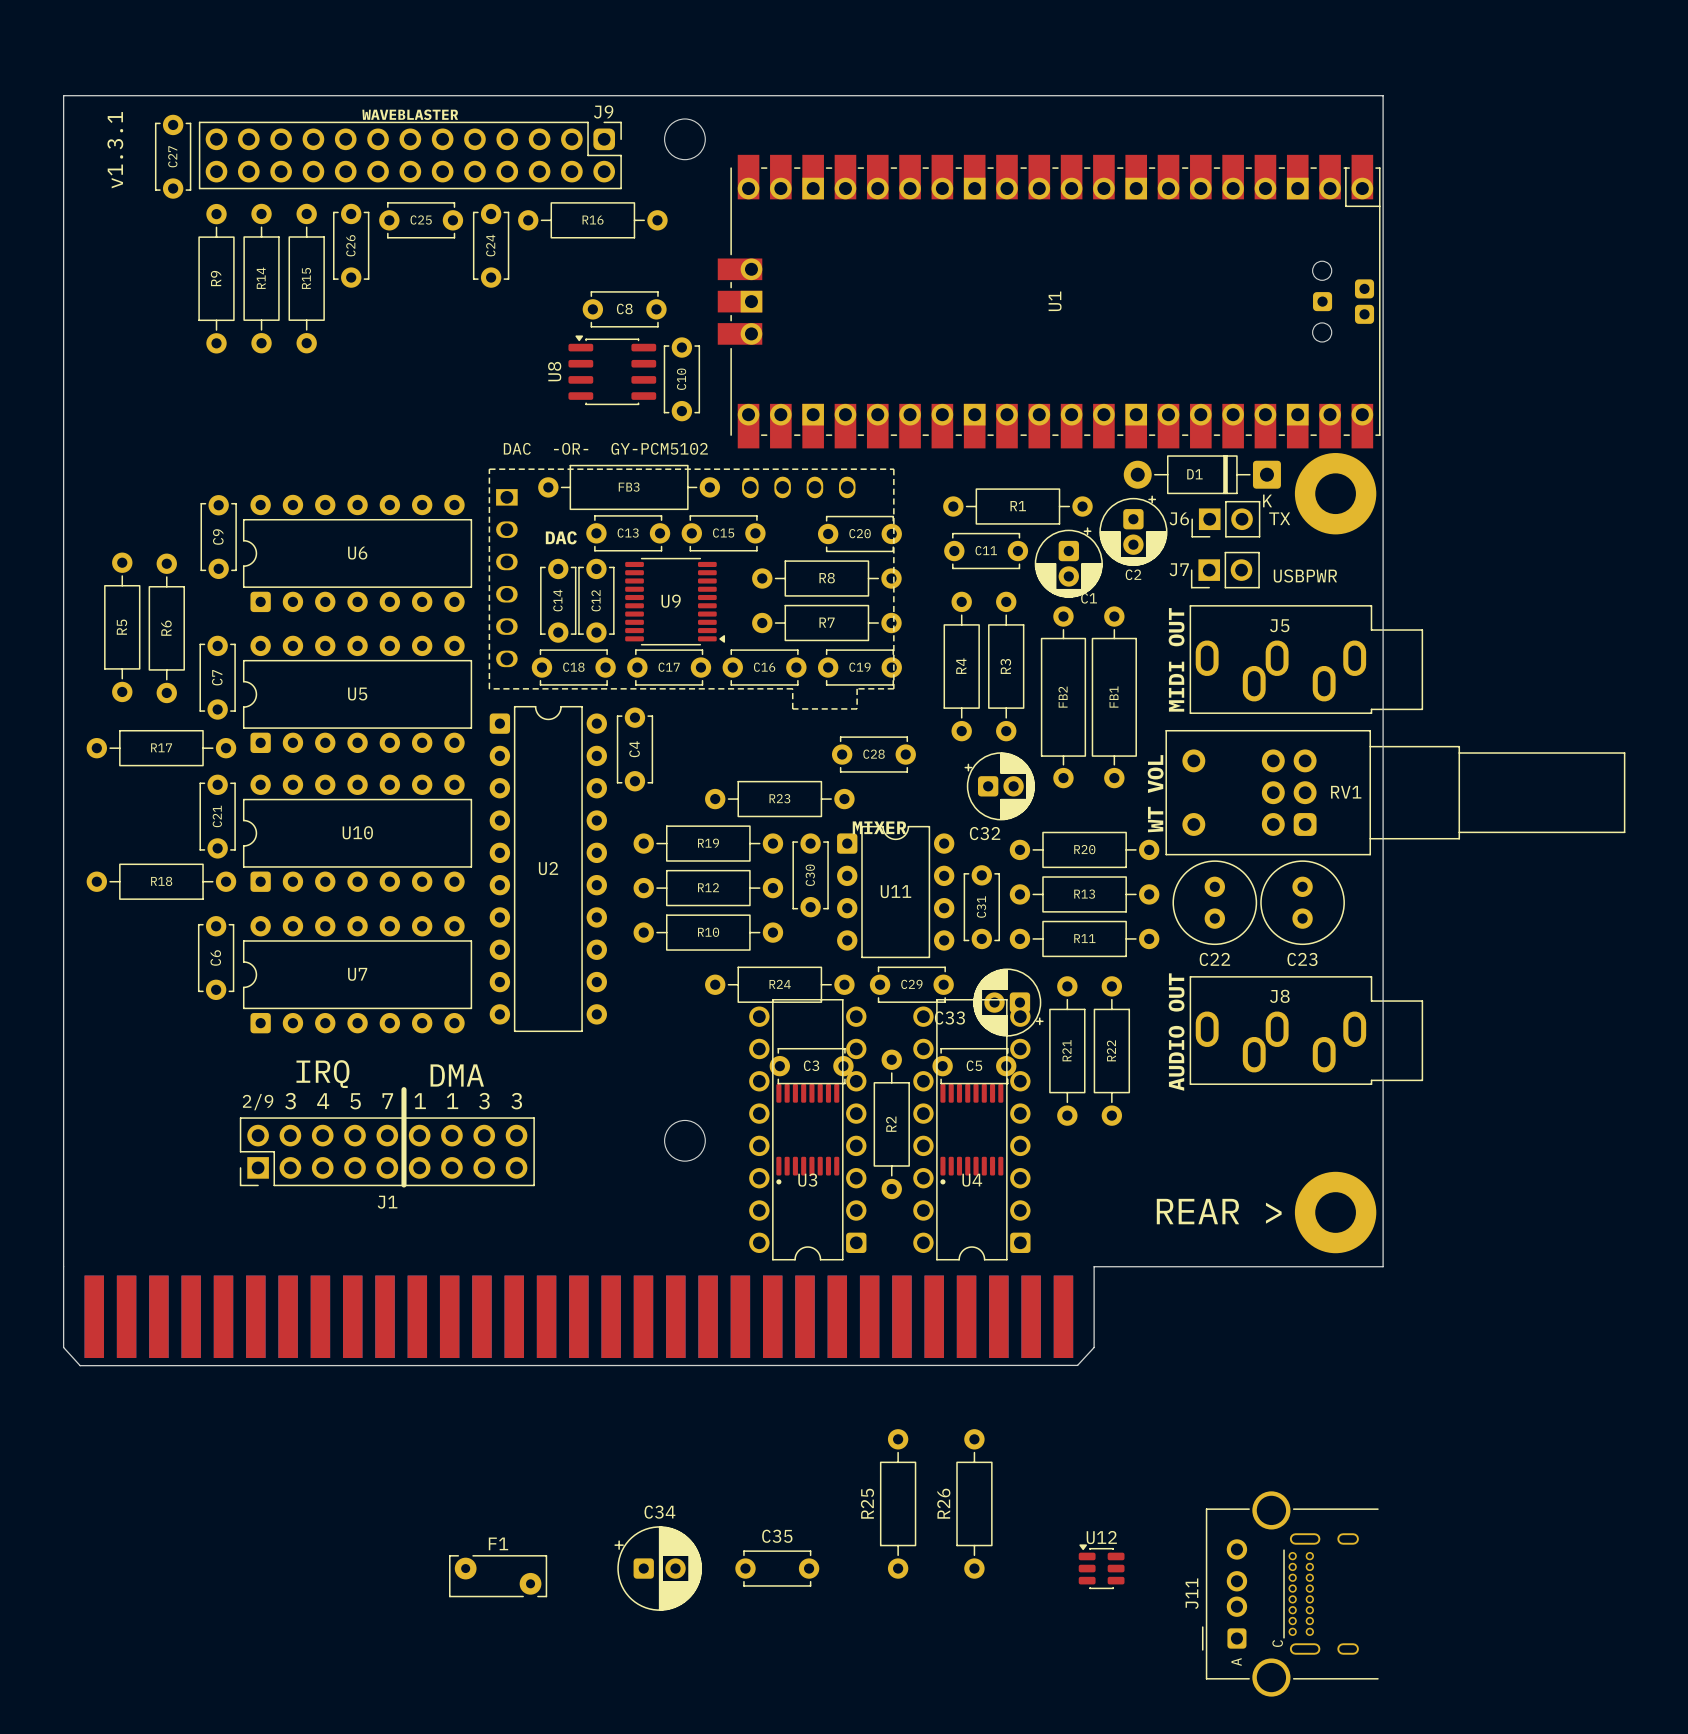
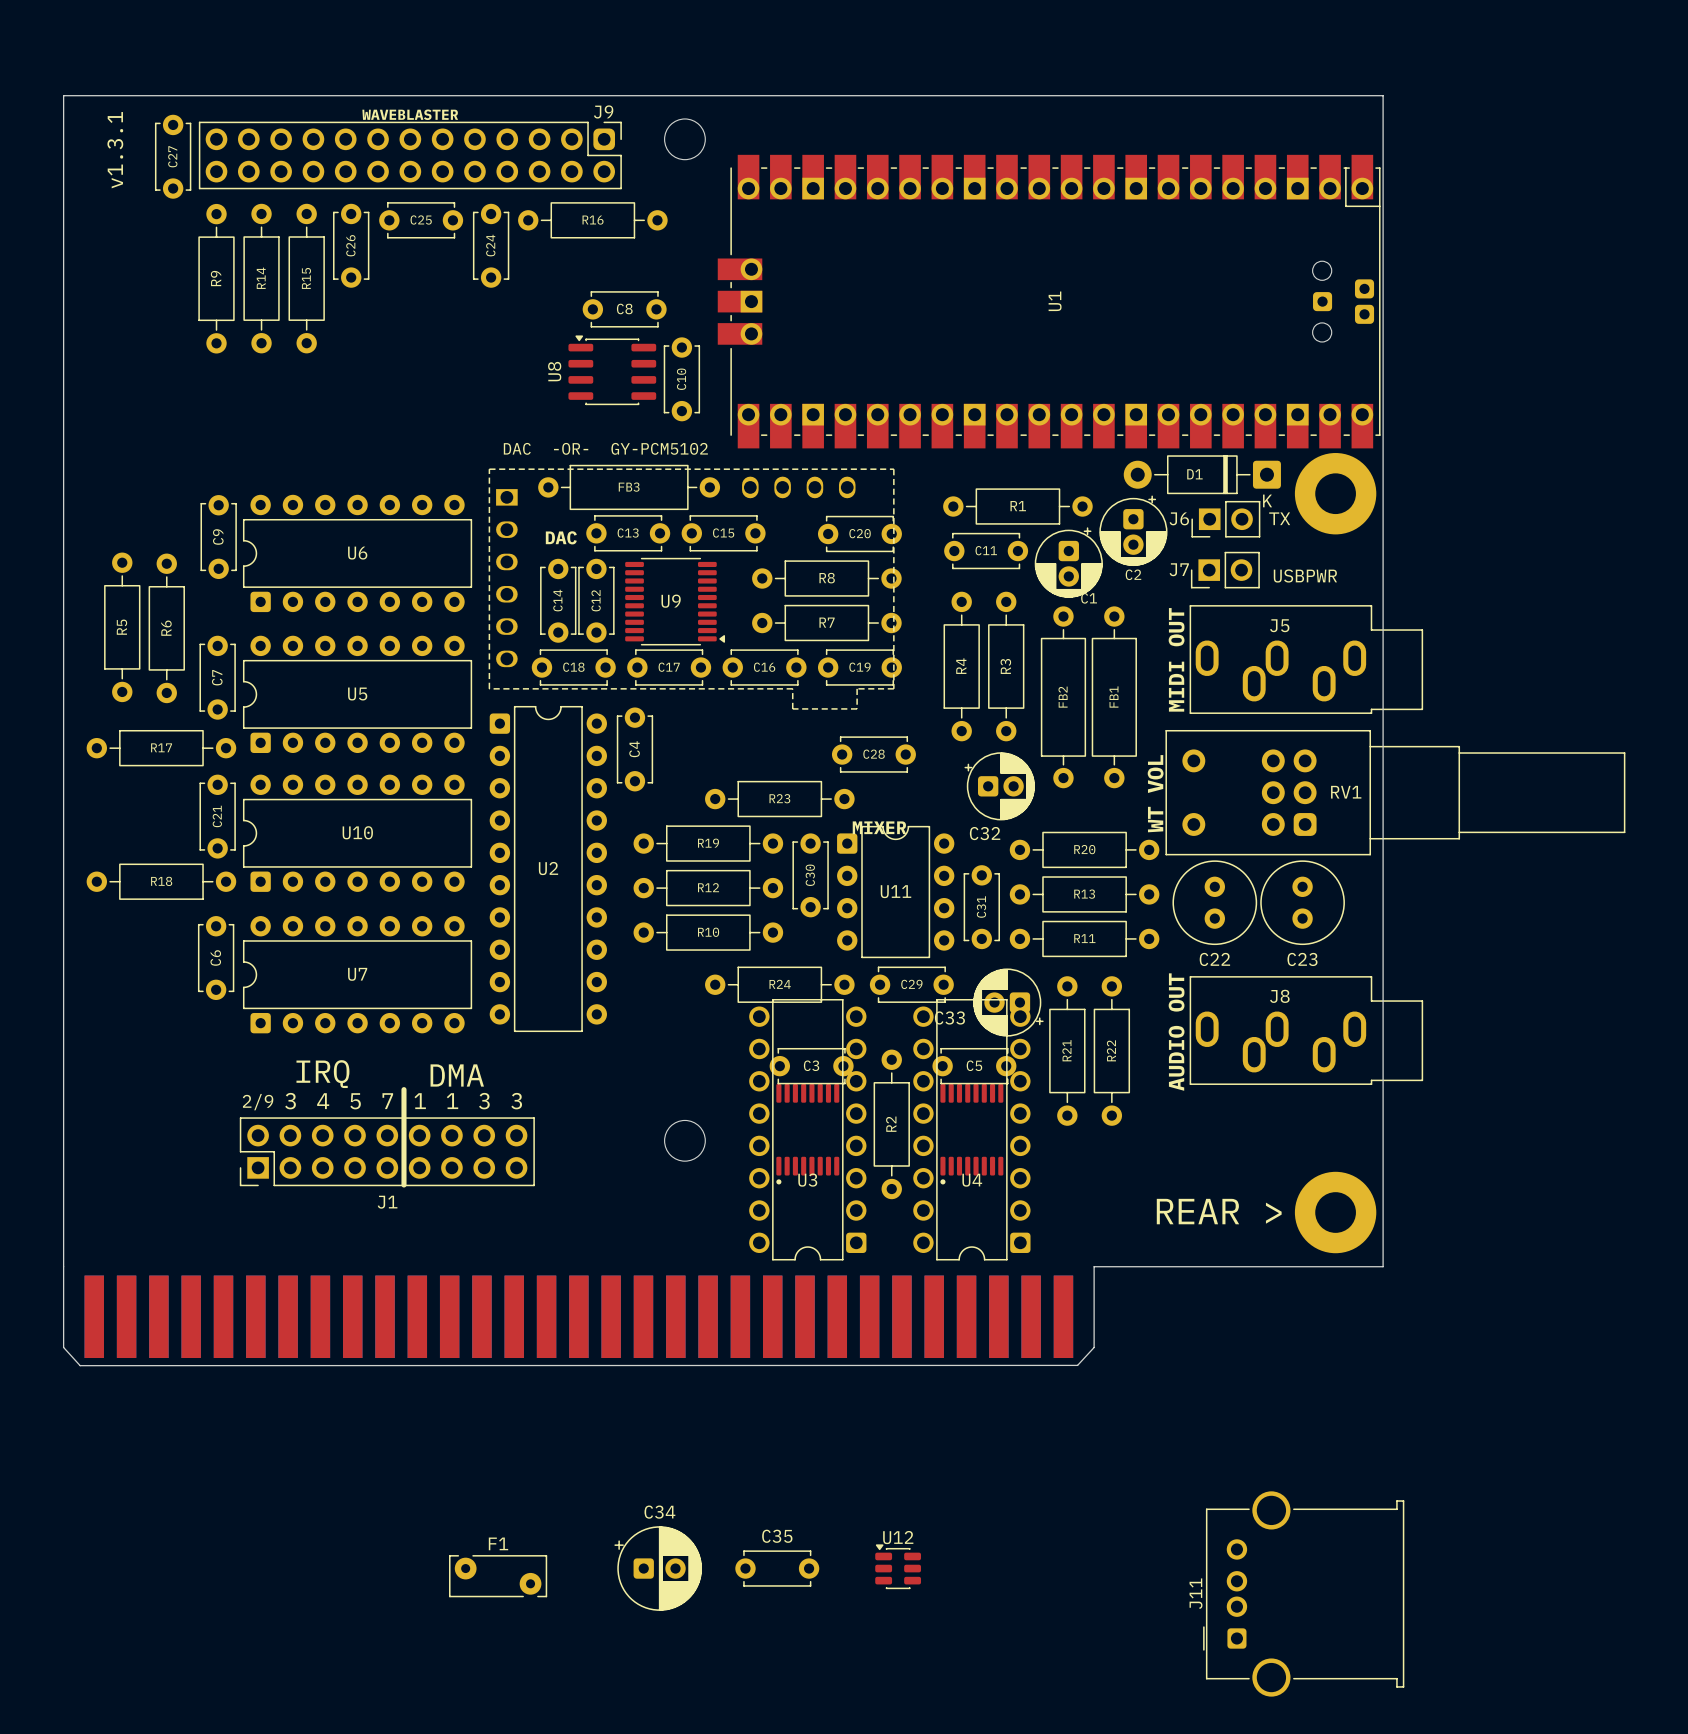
J11 footprint: [1201, 1491, 1379, 1697] -> [1203, 1491, 1405, 1697]
R25: (898, 1503) -> none
R26: (974, 1503) -> none
U12 position: (1101, 1566) -> (898, 1566)

